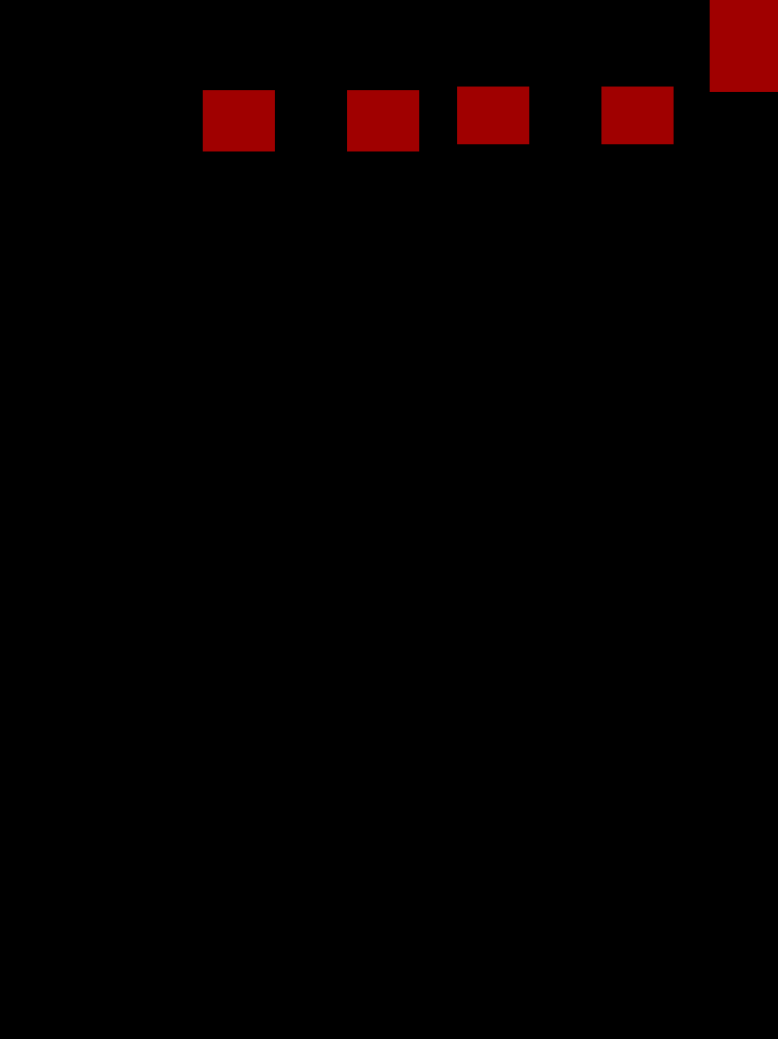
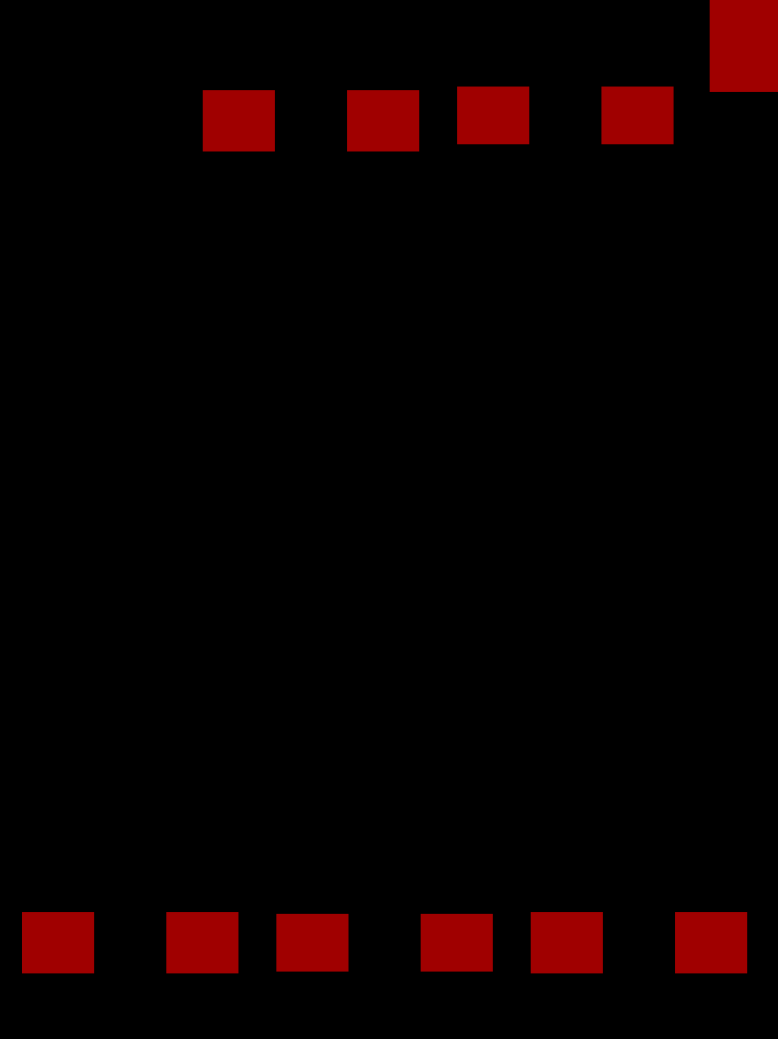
part: none -> (130, 942)
part: none -> (384, 942)
part: none -> (638, 942)

